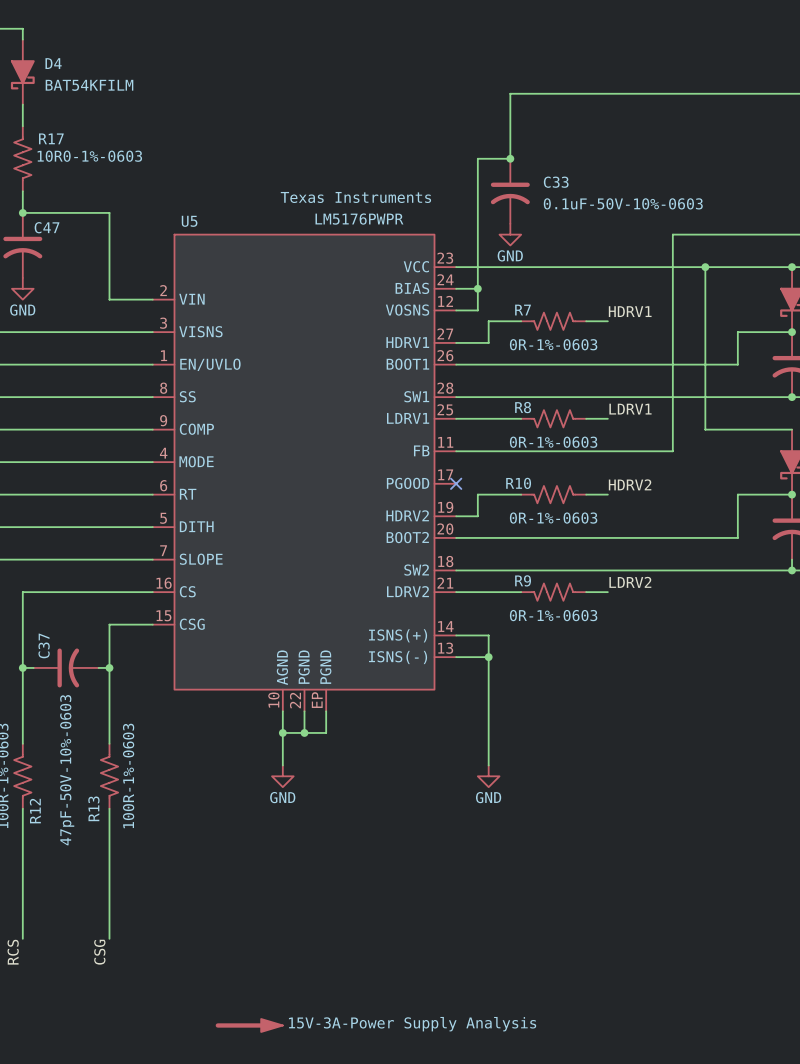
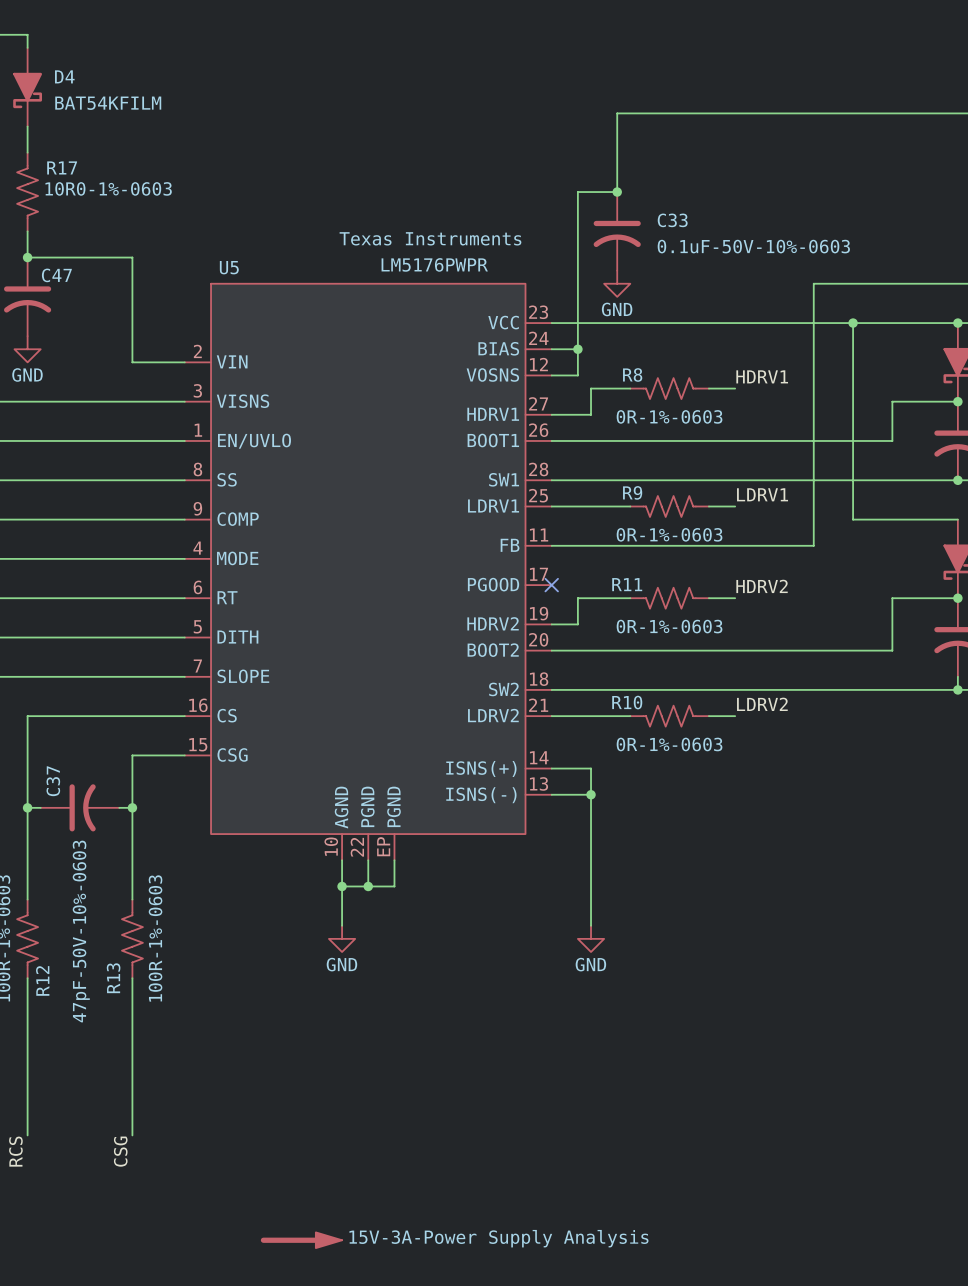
R7 name: R7 (523, 310) -> R8 (632, 374)
R8 name: R8 (523, 407) -> R9 (632, 492)
R10 name: R10 (518, 483) -> R11 (627, 584)
R9 name: R9 (523, 580) -> R10 (627, 702)

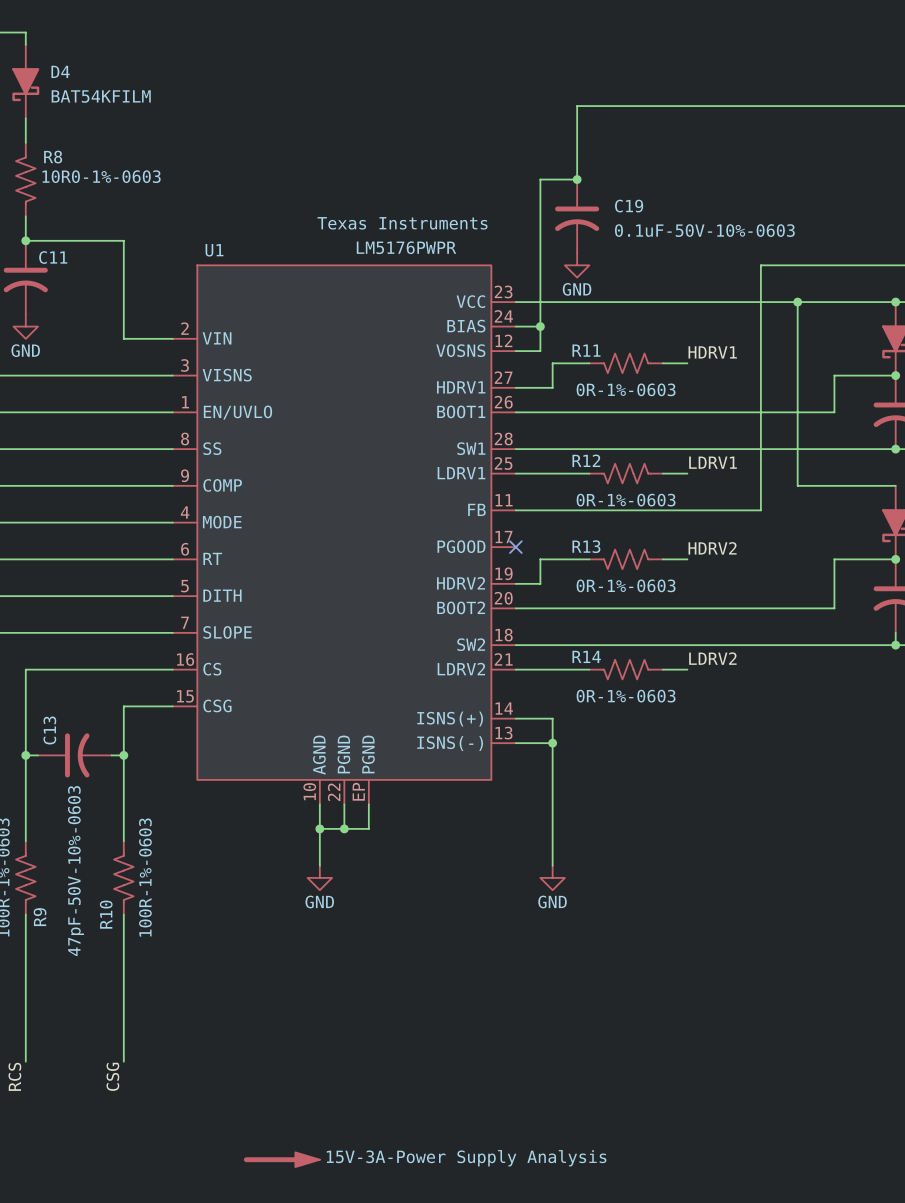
R17 name: R17 (62, 167) -> R8 (53, 157)
C33 name: C33 (672, 220) -> C19 (629, 206)
U5 name: U5 (229, 267) -> U1 (214, 250)
C47 name: C47 (56, 275) -> C11 (53, 257)
R8 name: R8 (632, 374) -> R11 (586, 350)
R9 name: R9 (632, 492) -> R12 (586, 460)
R11 name: R11 (627, 584) -> R13 (586, 546)
R10 name: R10 (627, 702) -> R14 (586, 656)
C37 name: C37 (53, 781) -> C13 (49, 730)
R13 name: R13 (113, 978) -> R10 (106, 914)
R12 name: R12 (42, 980) -> R9 (40, 917)

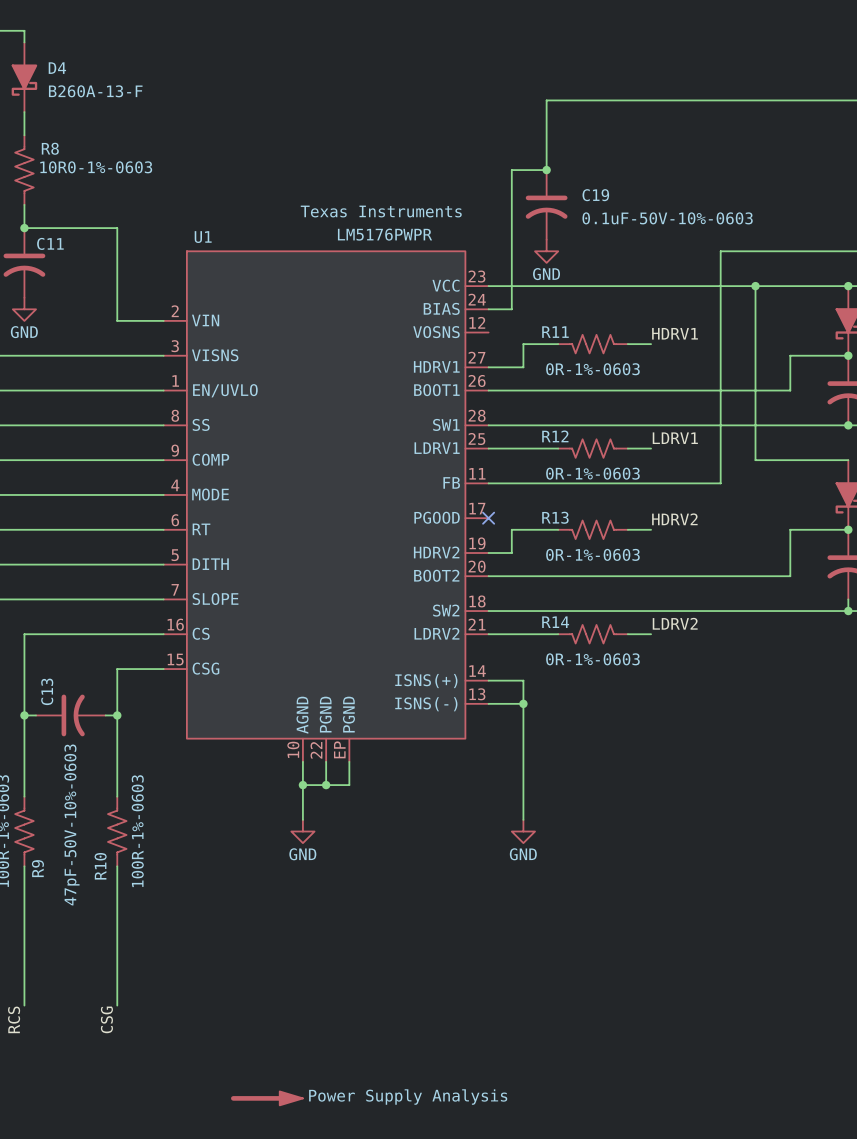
D4 value: BAT54KFILM (101, 96) -> B260A-13-F (95, 91)
wire: (540, 326) (540, 351) (515, 351) -> none
junction: (540, 326) -> none
power symbol: 15V-3A-Power Supply Analysis (281, 1159) -> Power Supply Analysis (266, 1098)

